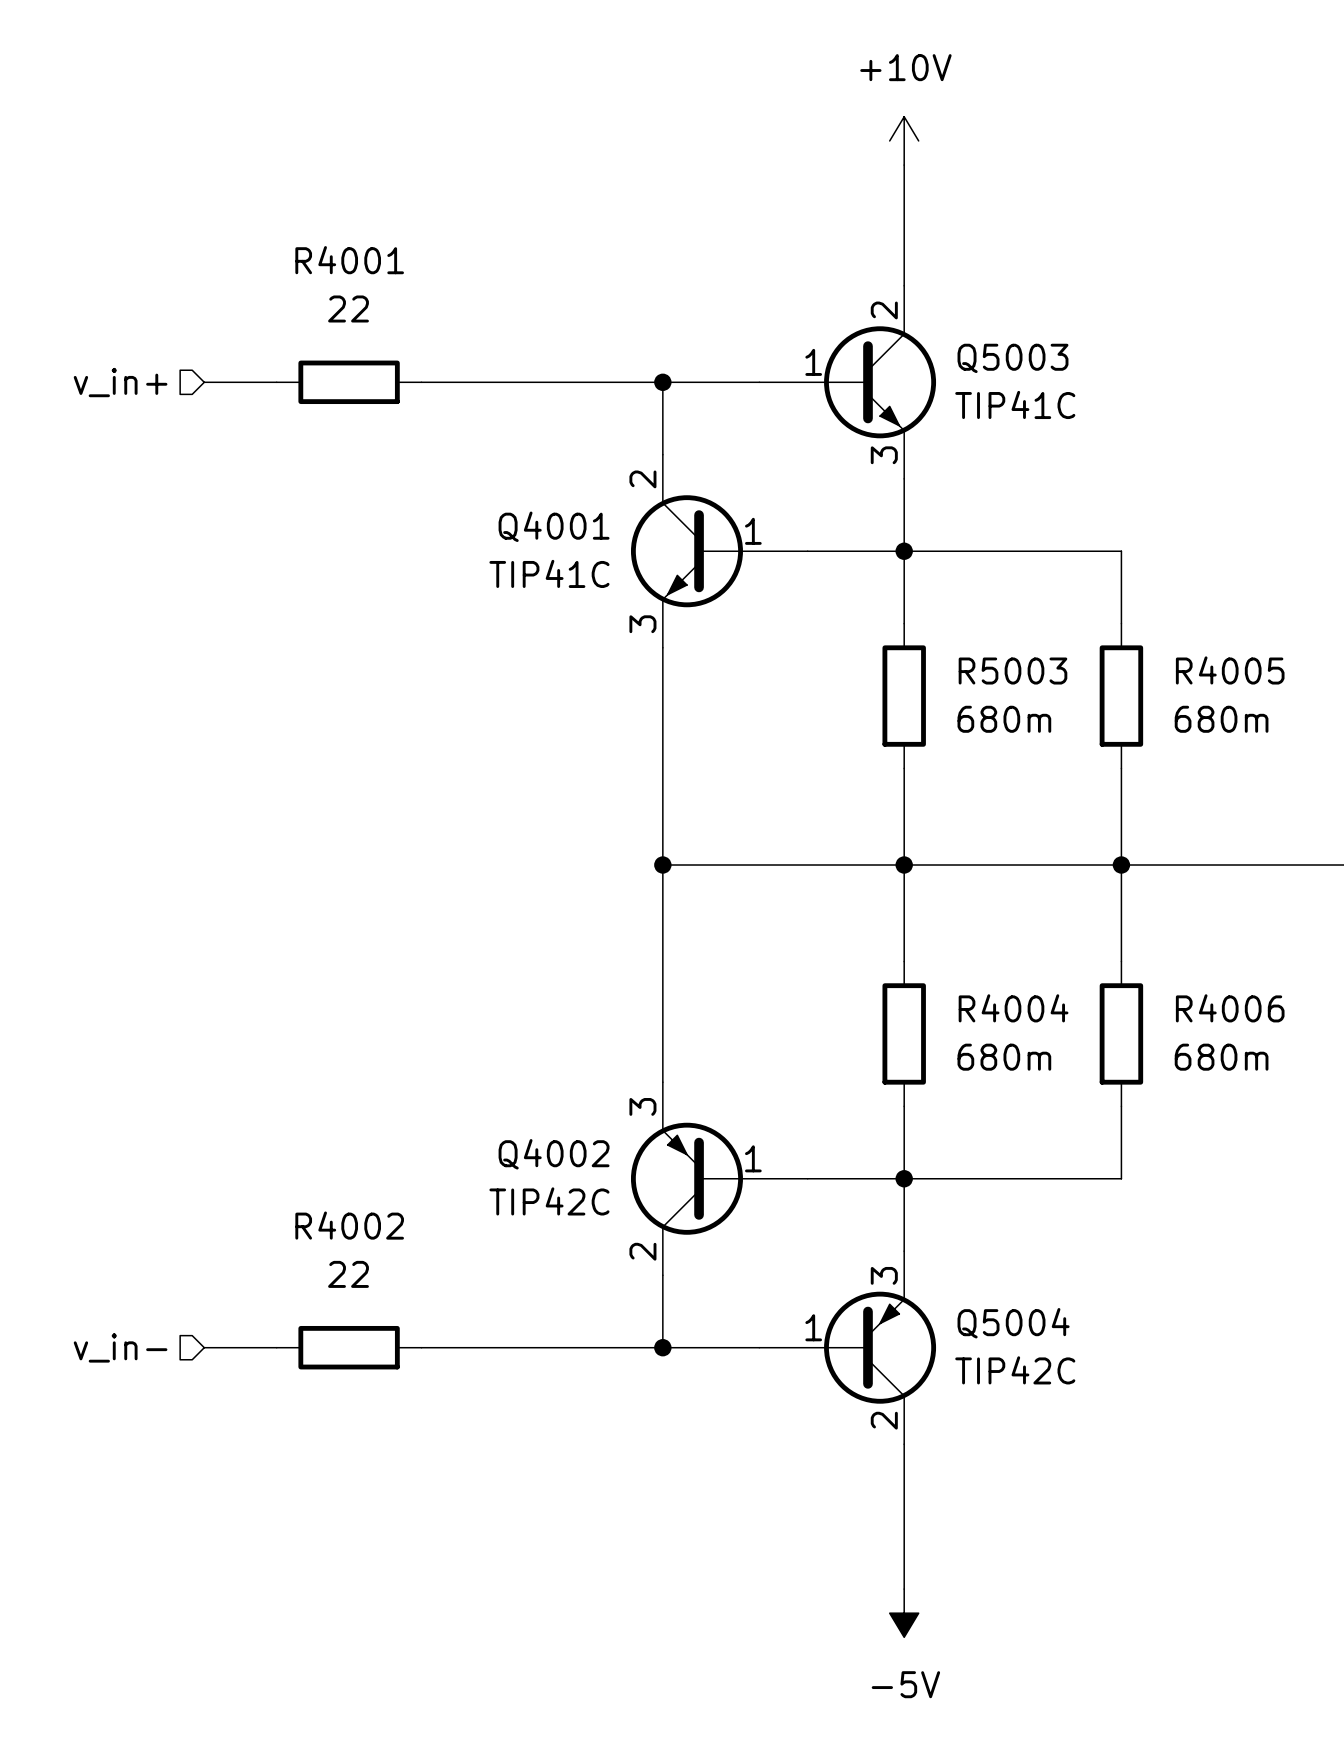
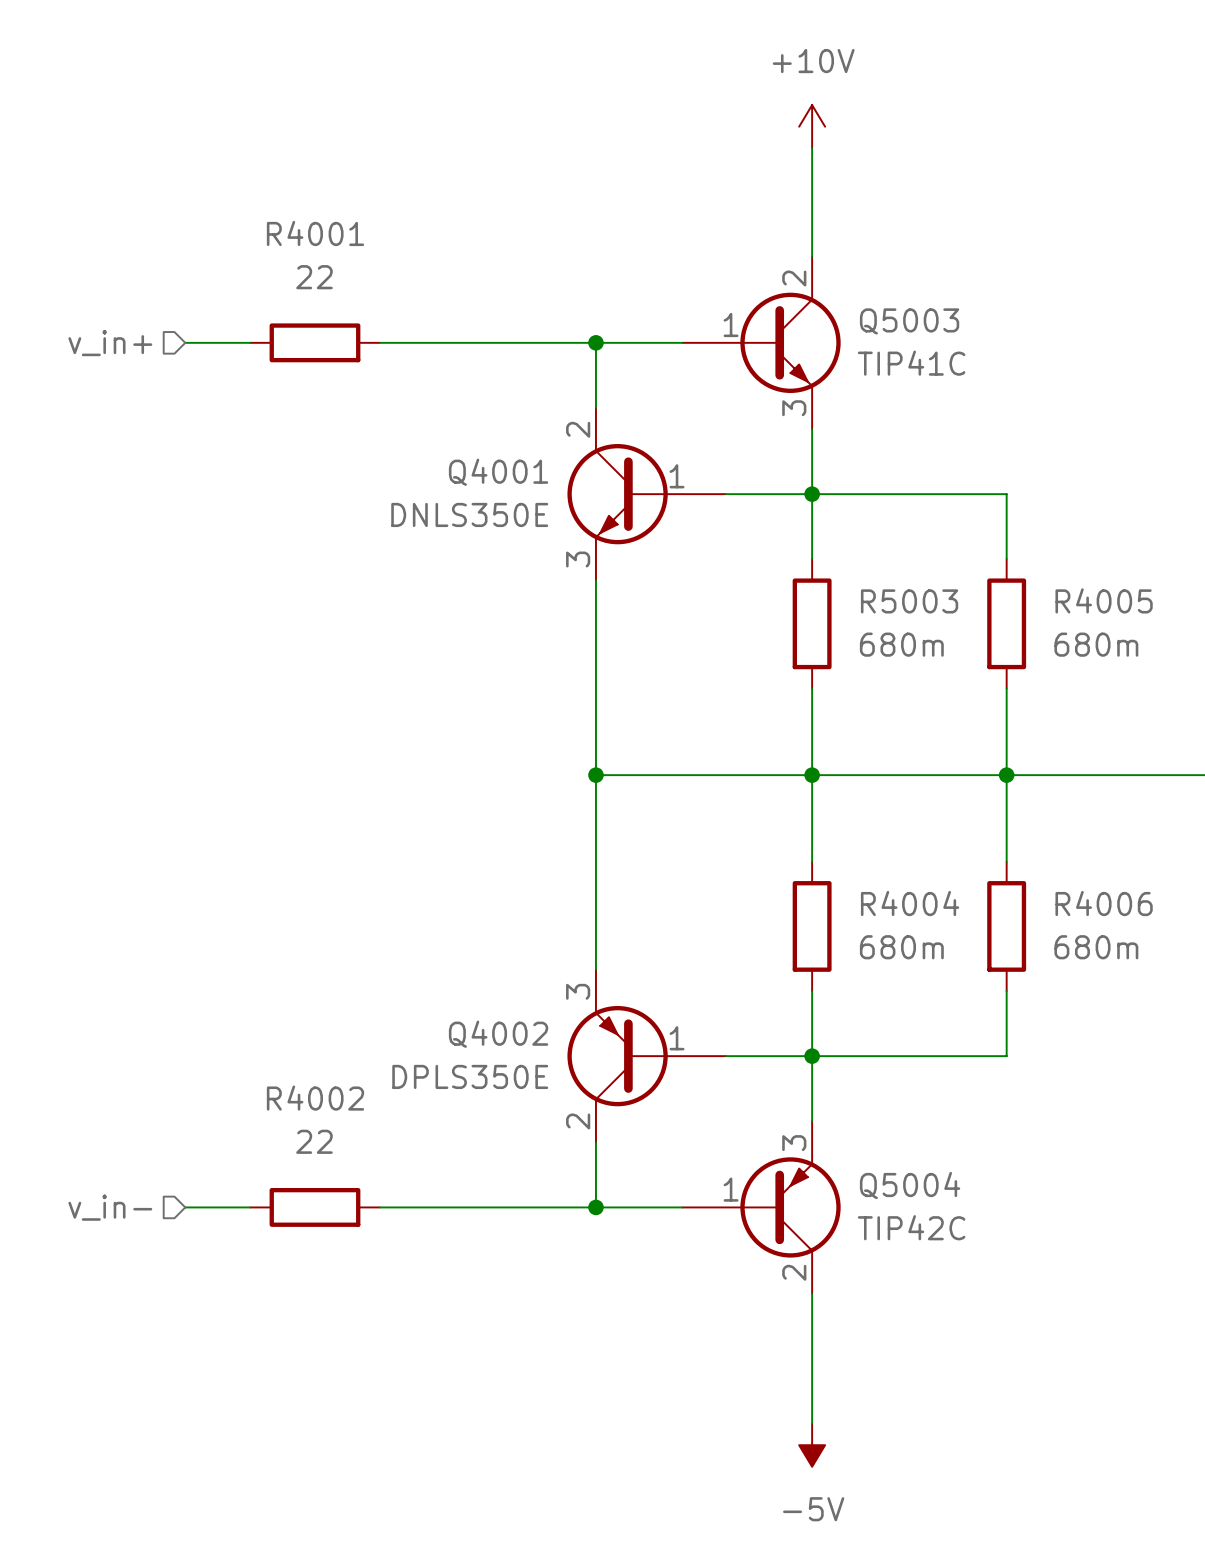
Q4001 value: TIP41C (549, 573) -> DNLS350E (469, 514)
Q4002 value: TIP42C (549, 1201) -> DPLS350E (470, 1076)

